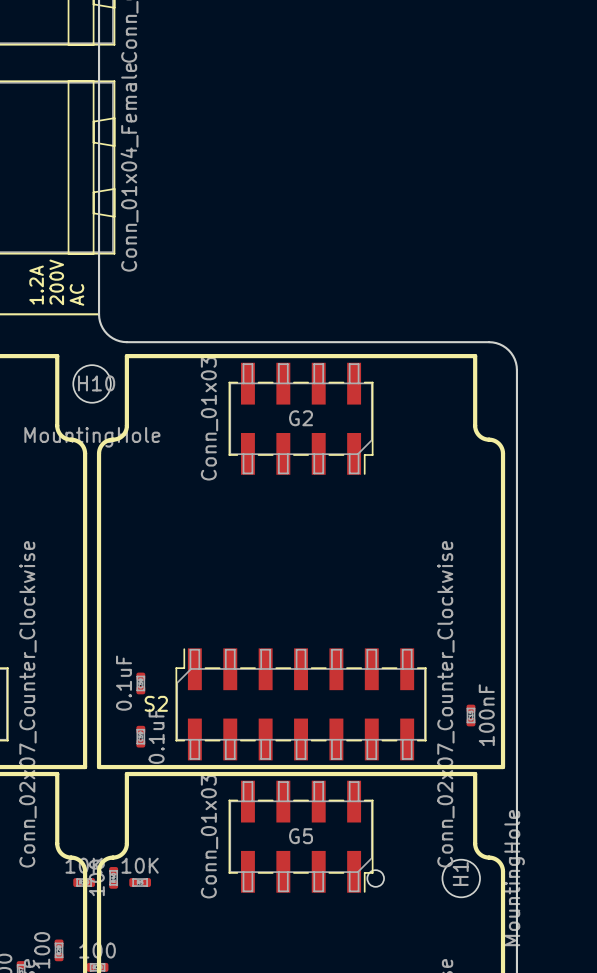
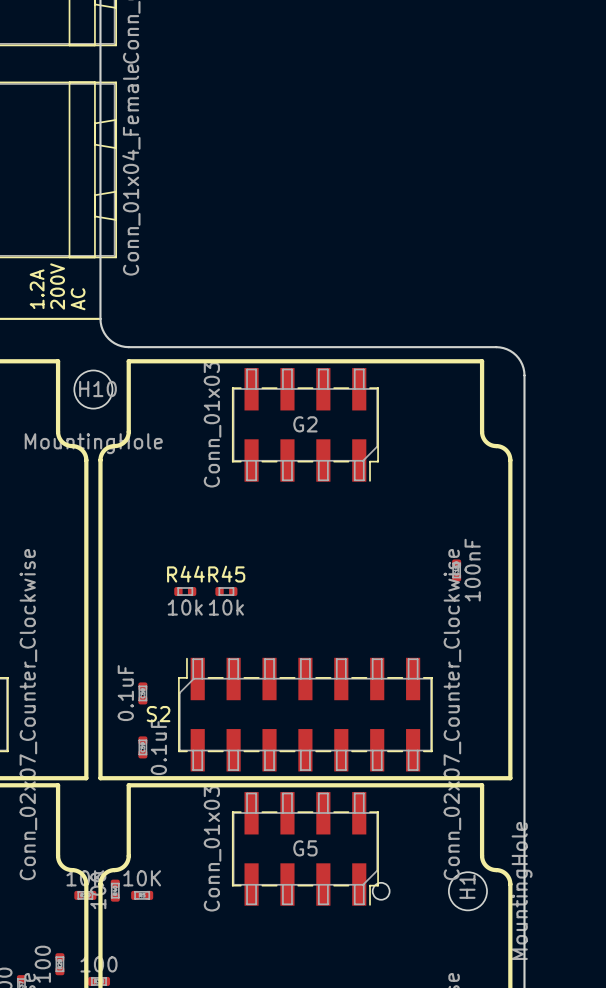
R44: none -> 10k (185, 591)
R45: none -> 10k (226, 591)
part position: (470, 715) -> (456, 570)

